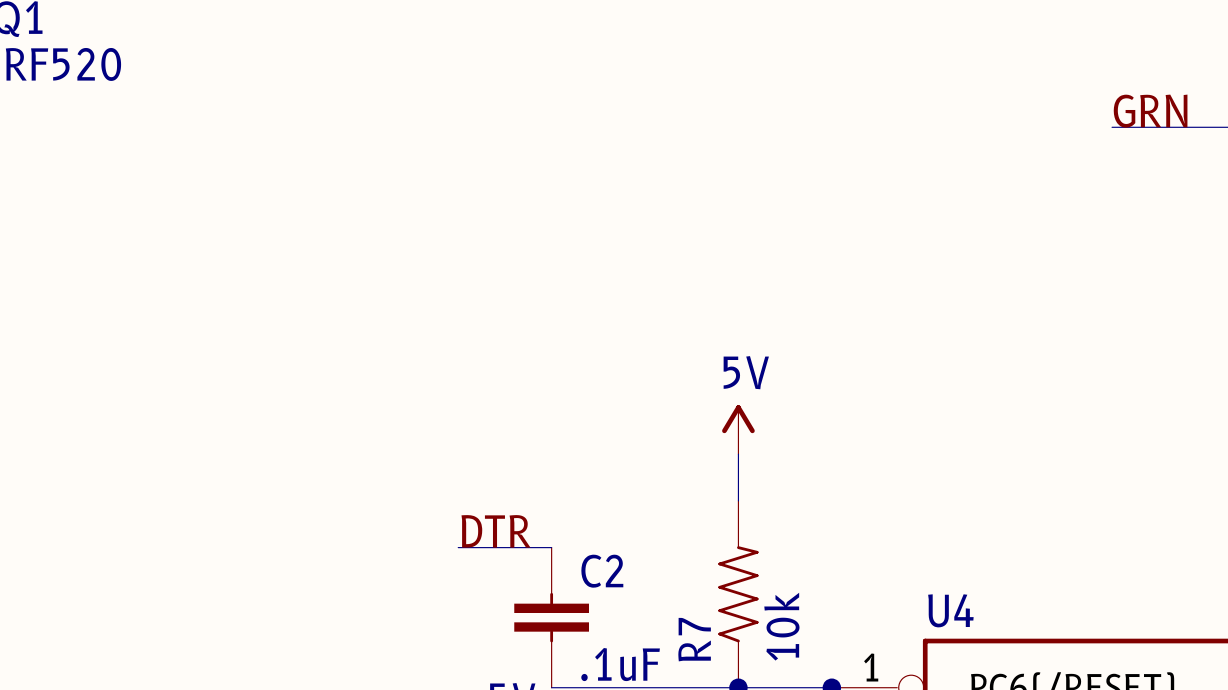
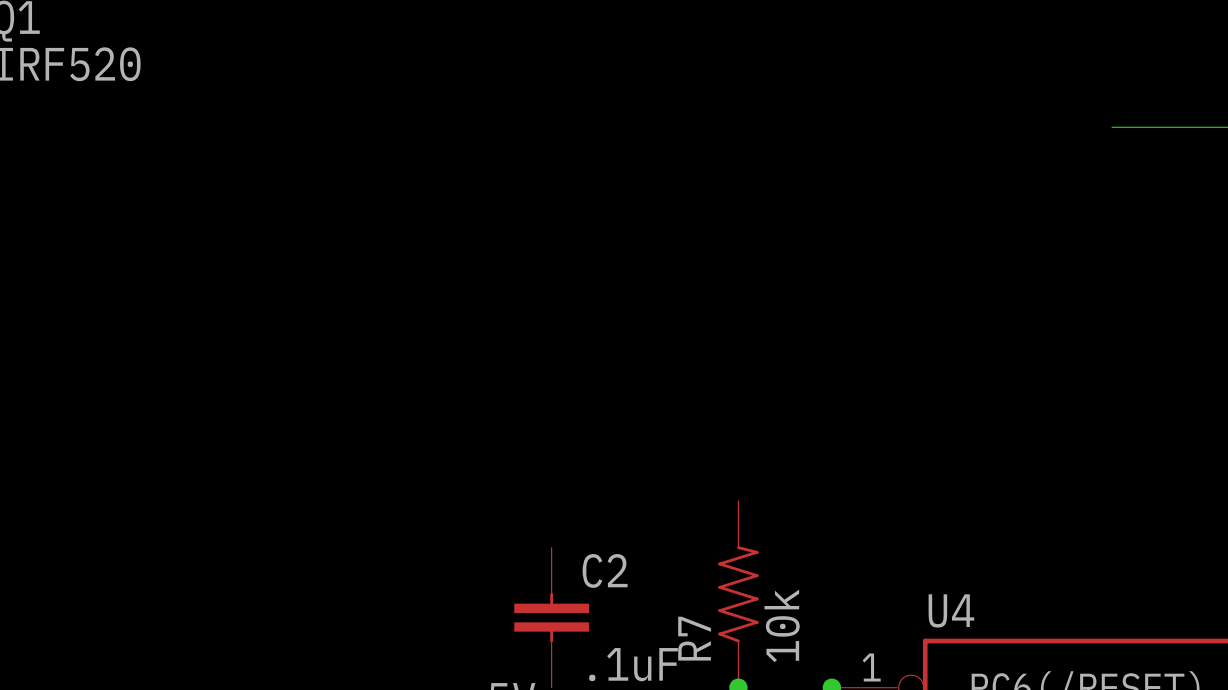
label: GRN (1150, 111) -> none
power symbol: 5V (738, 429) -> none
wire: (738, 454) (738, 500) -> none
label: DTR (496, 531) -> none
wire: (458, 547) (551, 547) -> none
wire: (551, 687) (831, 687) -> none

